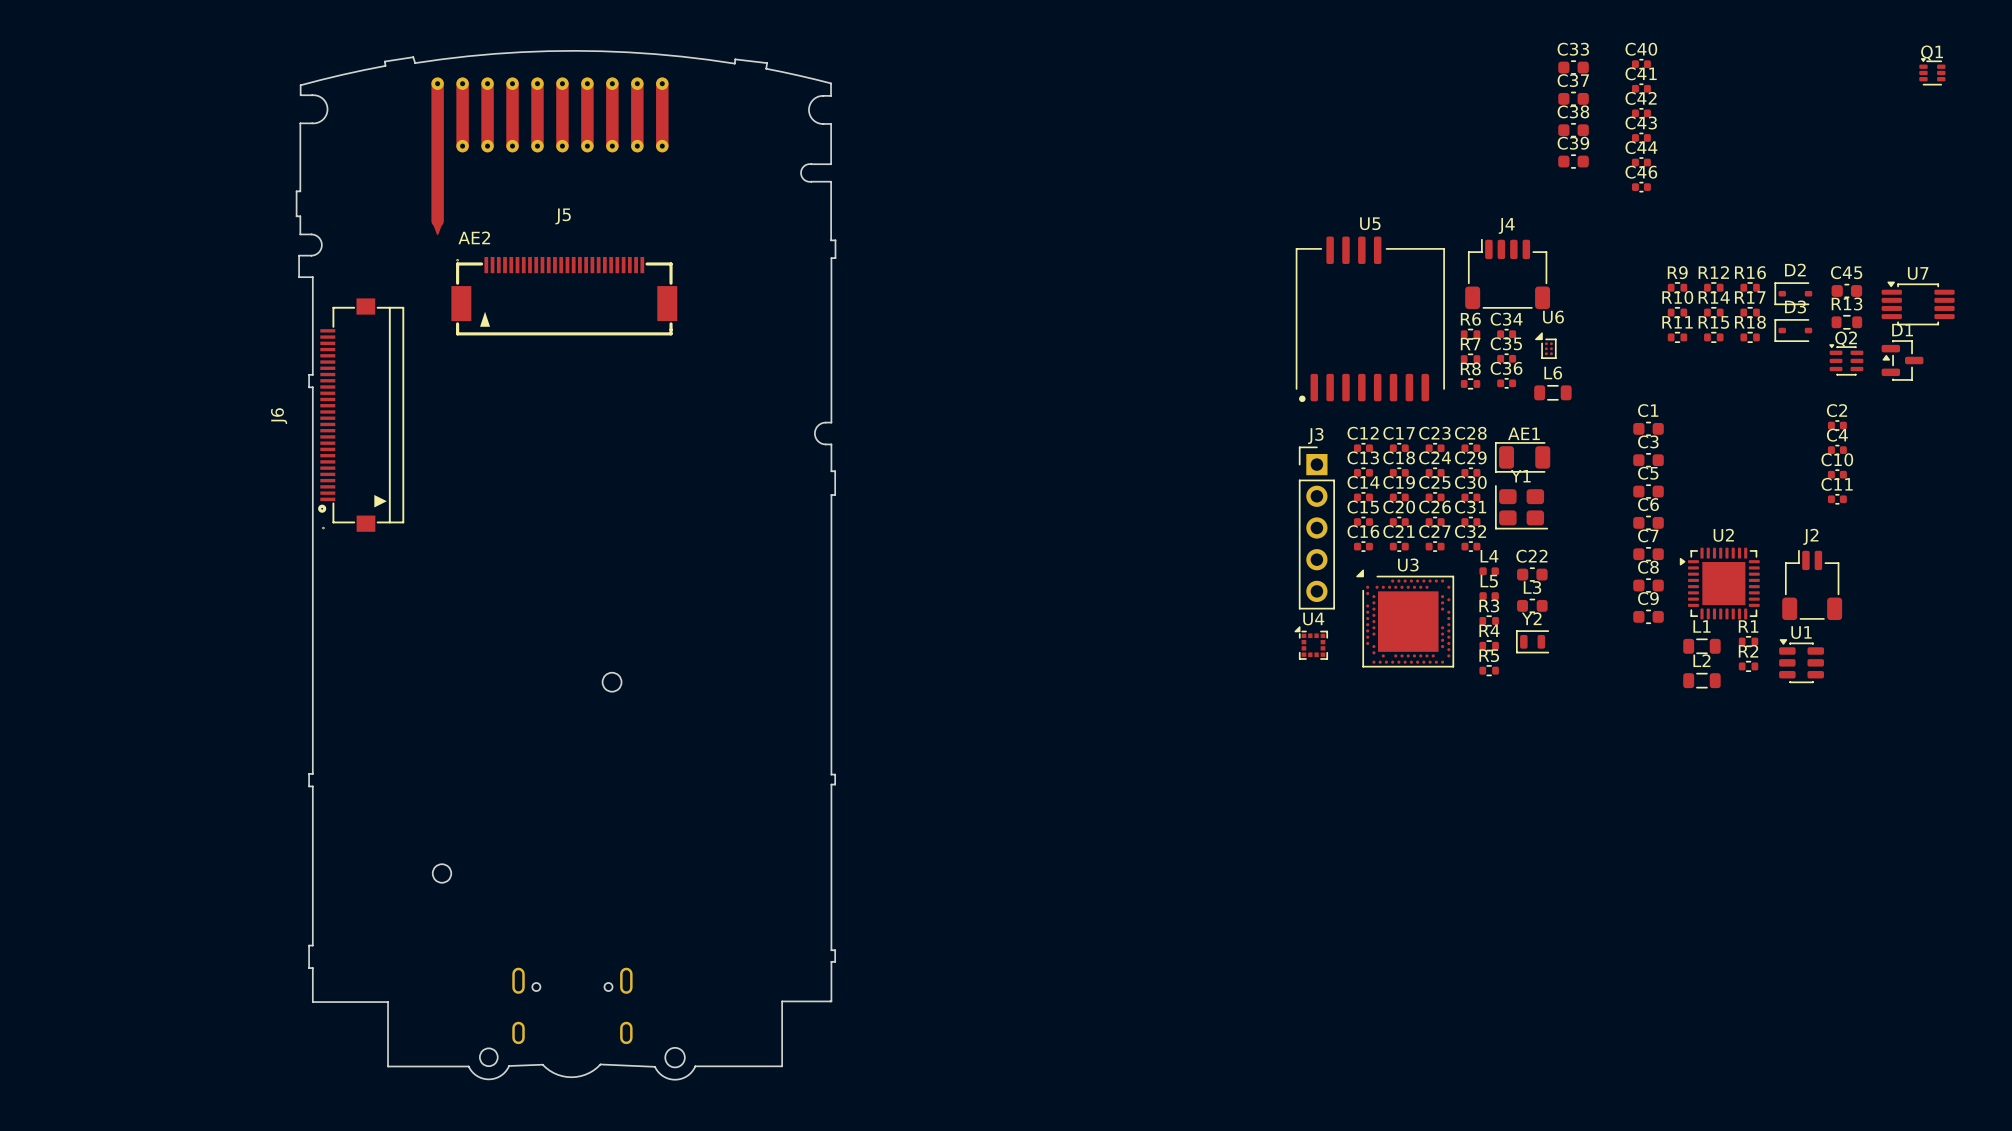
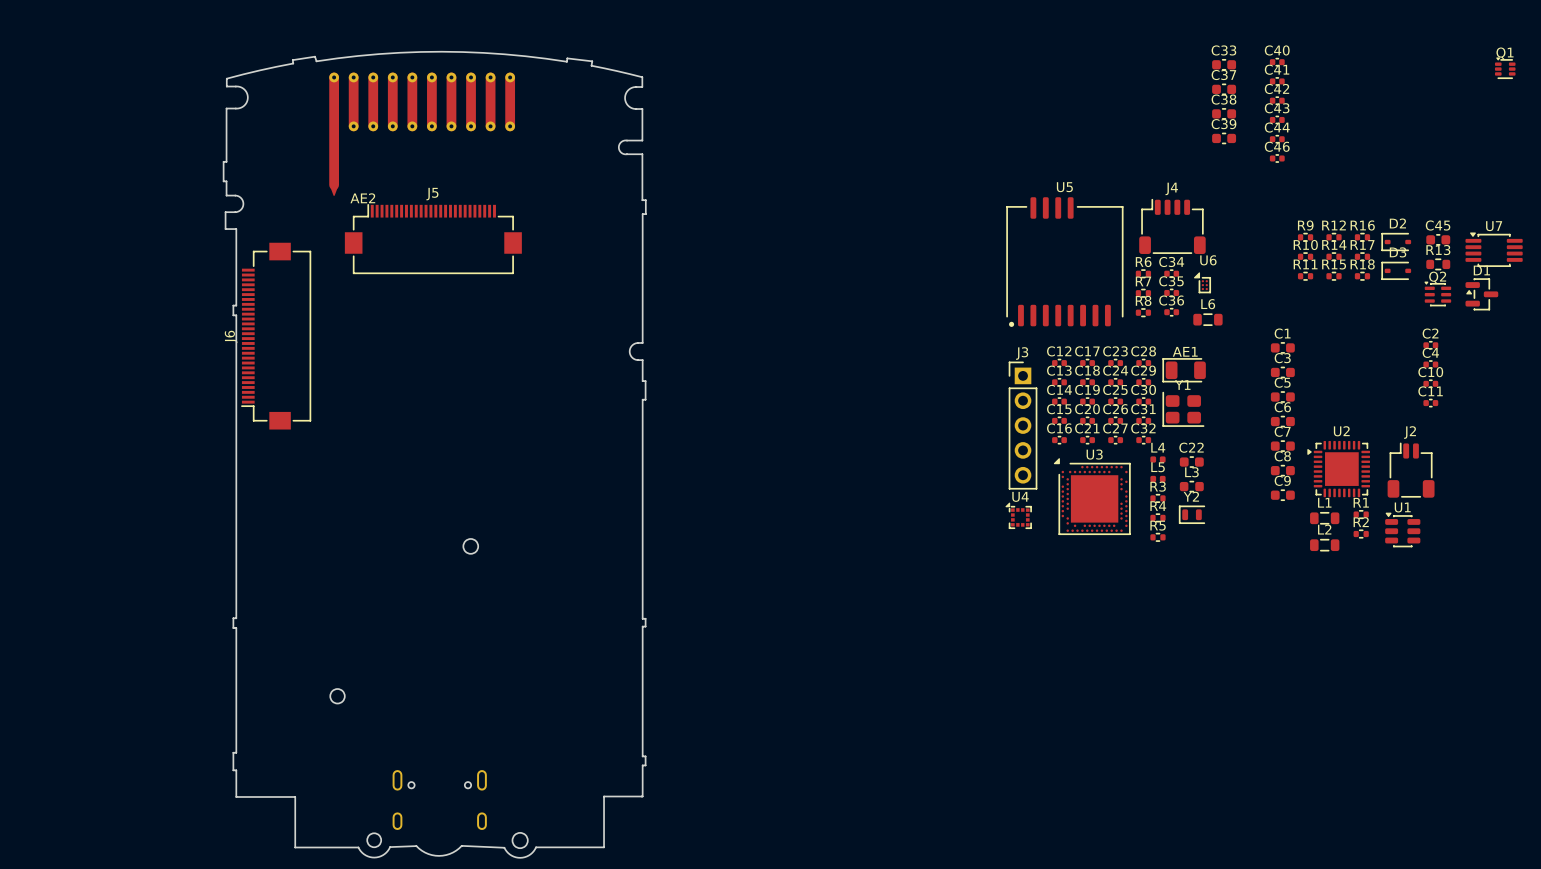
J5 footprint: [451, 256, 678, 336] -> [344, 204, 522, 274]
J6 footprint: [318, 298, 405, 532] -> [241, 242, 311, 430]

